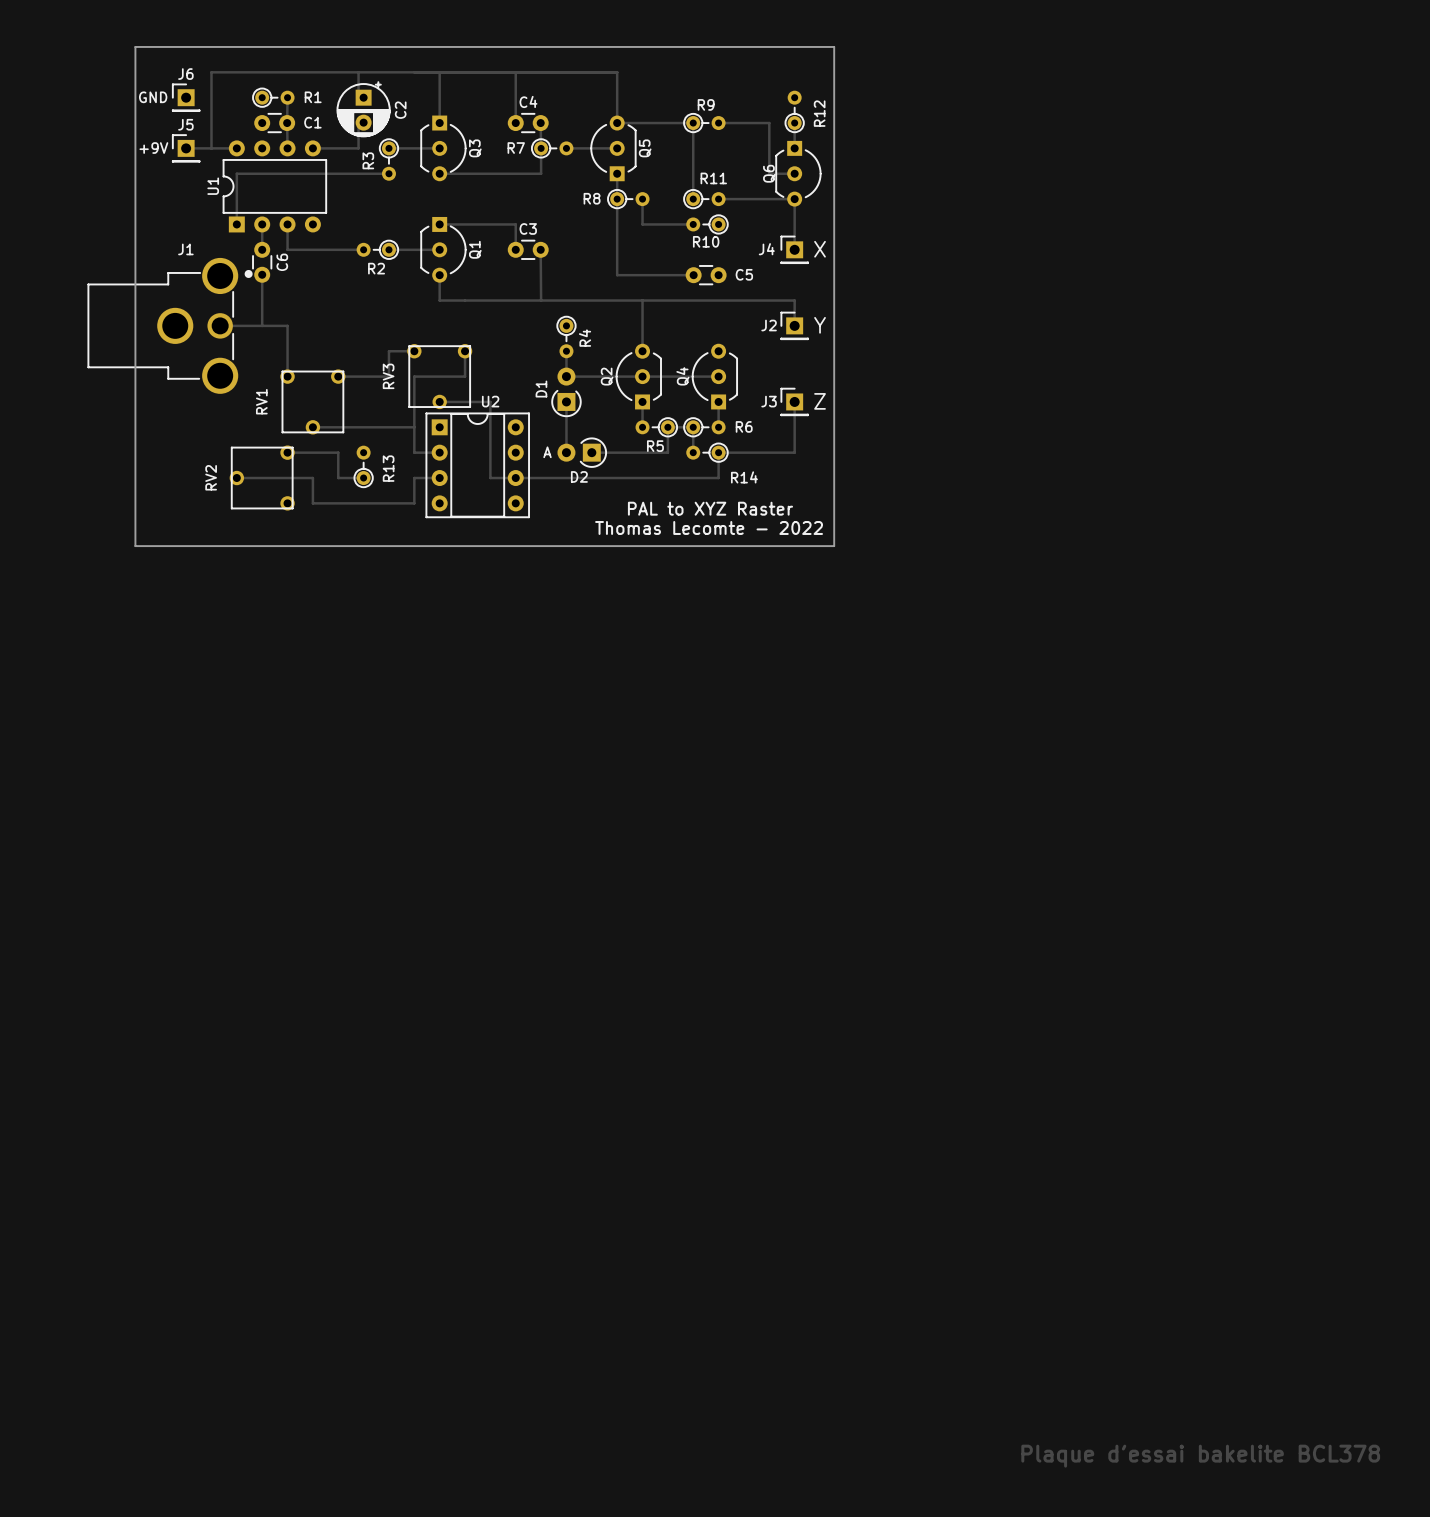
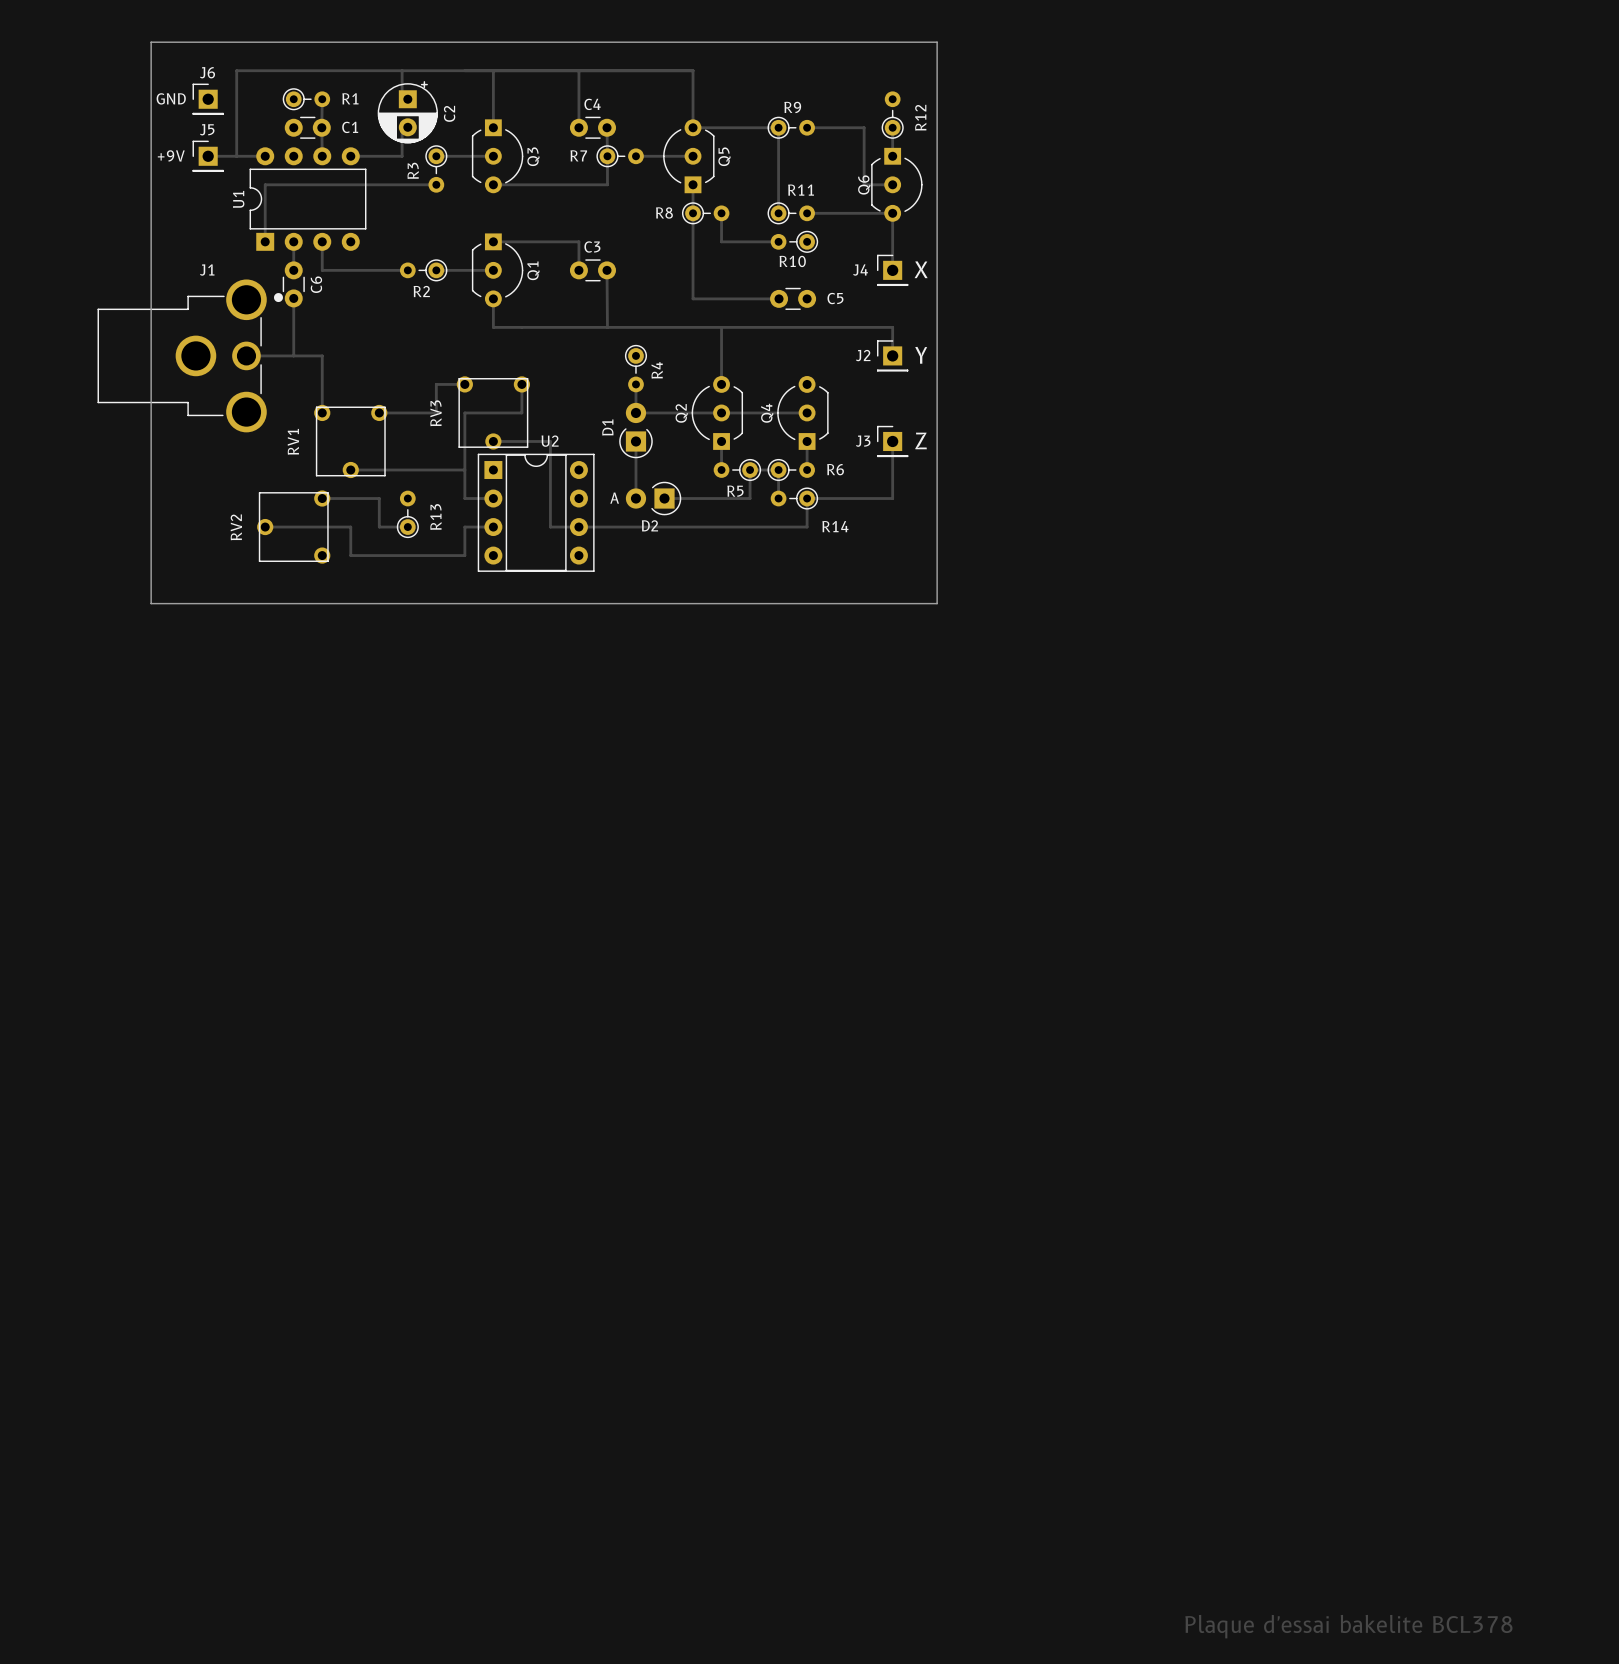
text: PAL to XYZ Raster (710, 508) -> none
text: Thomas Lecomte - 2022 (709, 527) -> none

